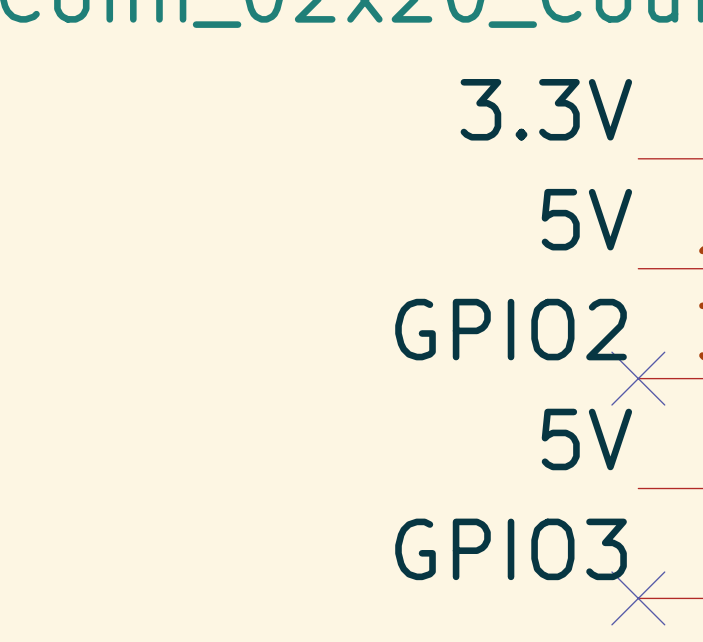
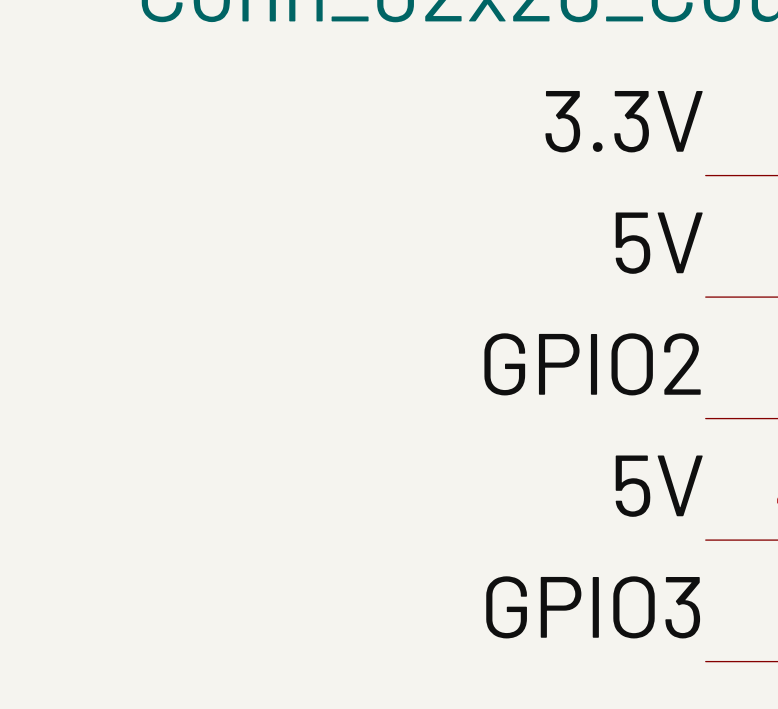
no-connect mark: (638, 378) -> none
no-connect mark: (638, 598) -> none

